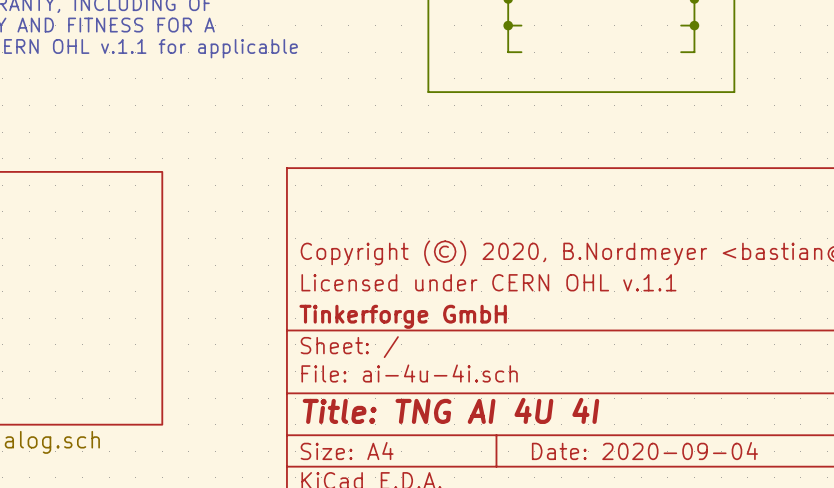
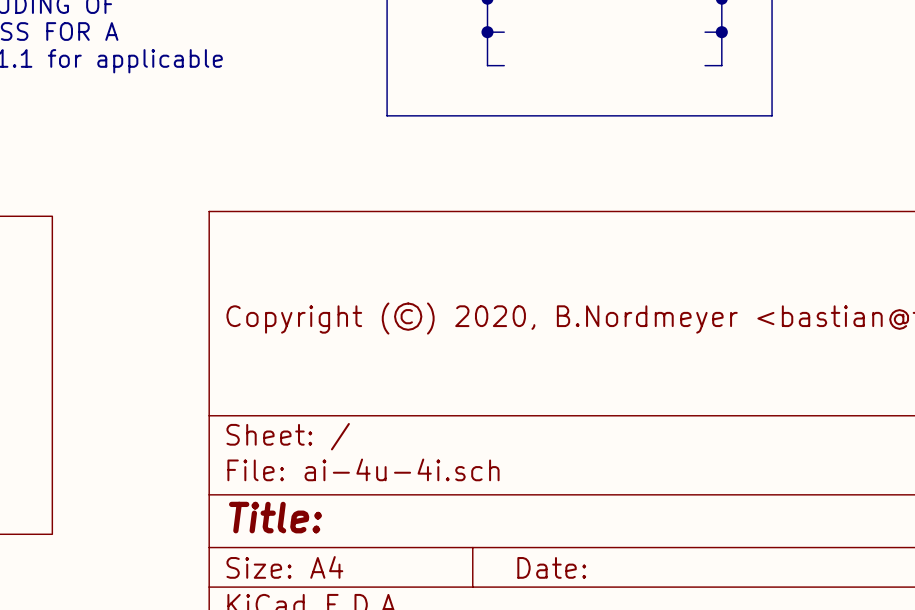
title block: Licensed under CERN OHL v.1.1 (488, 282) -> none
title block: Tinkerforge GmbH (403, 316) -> none
title block: Title: TNG AI 4U 4I (450, 410) -> Title: (275, 517)
title block: Date: 2020-09-04 (644, 451) -> Date: (551, 567)

